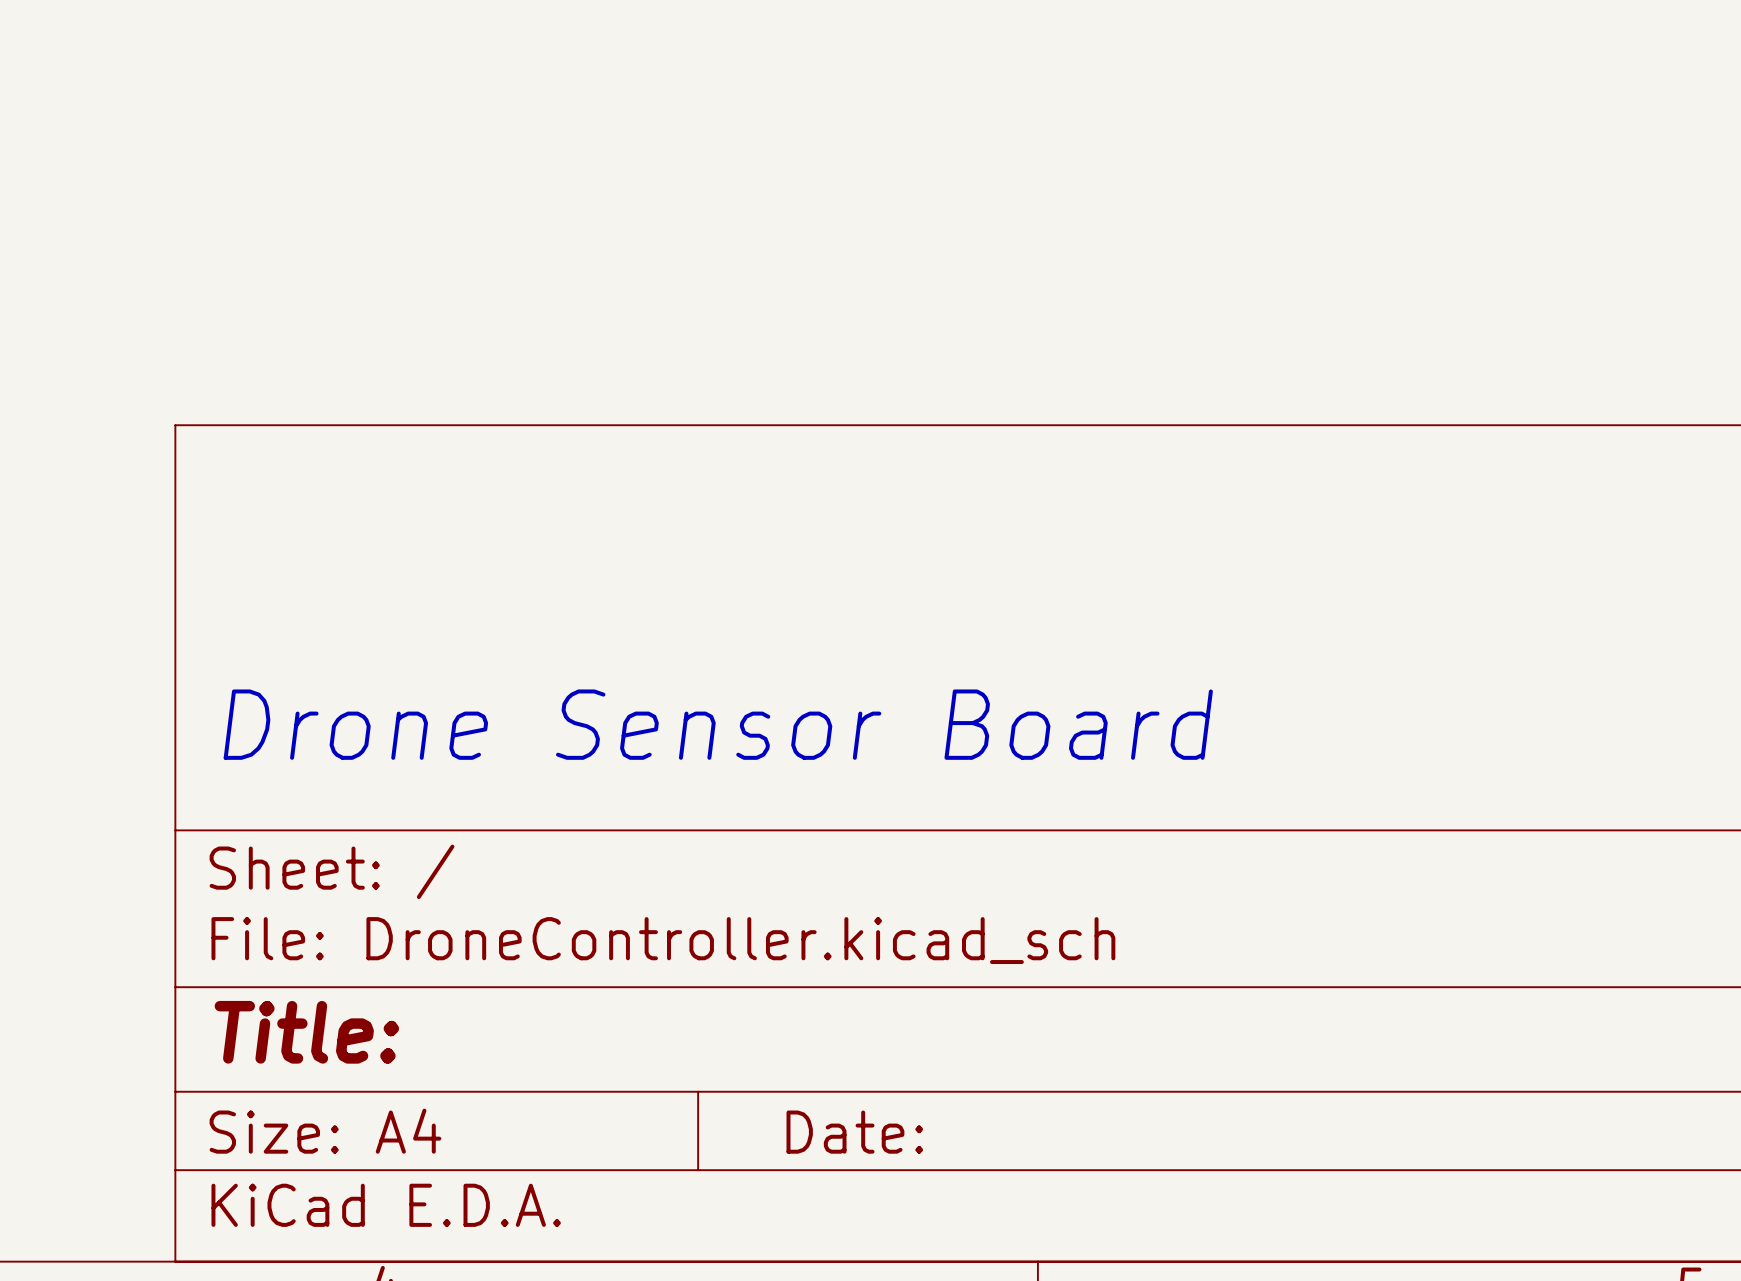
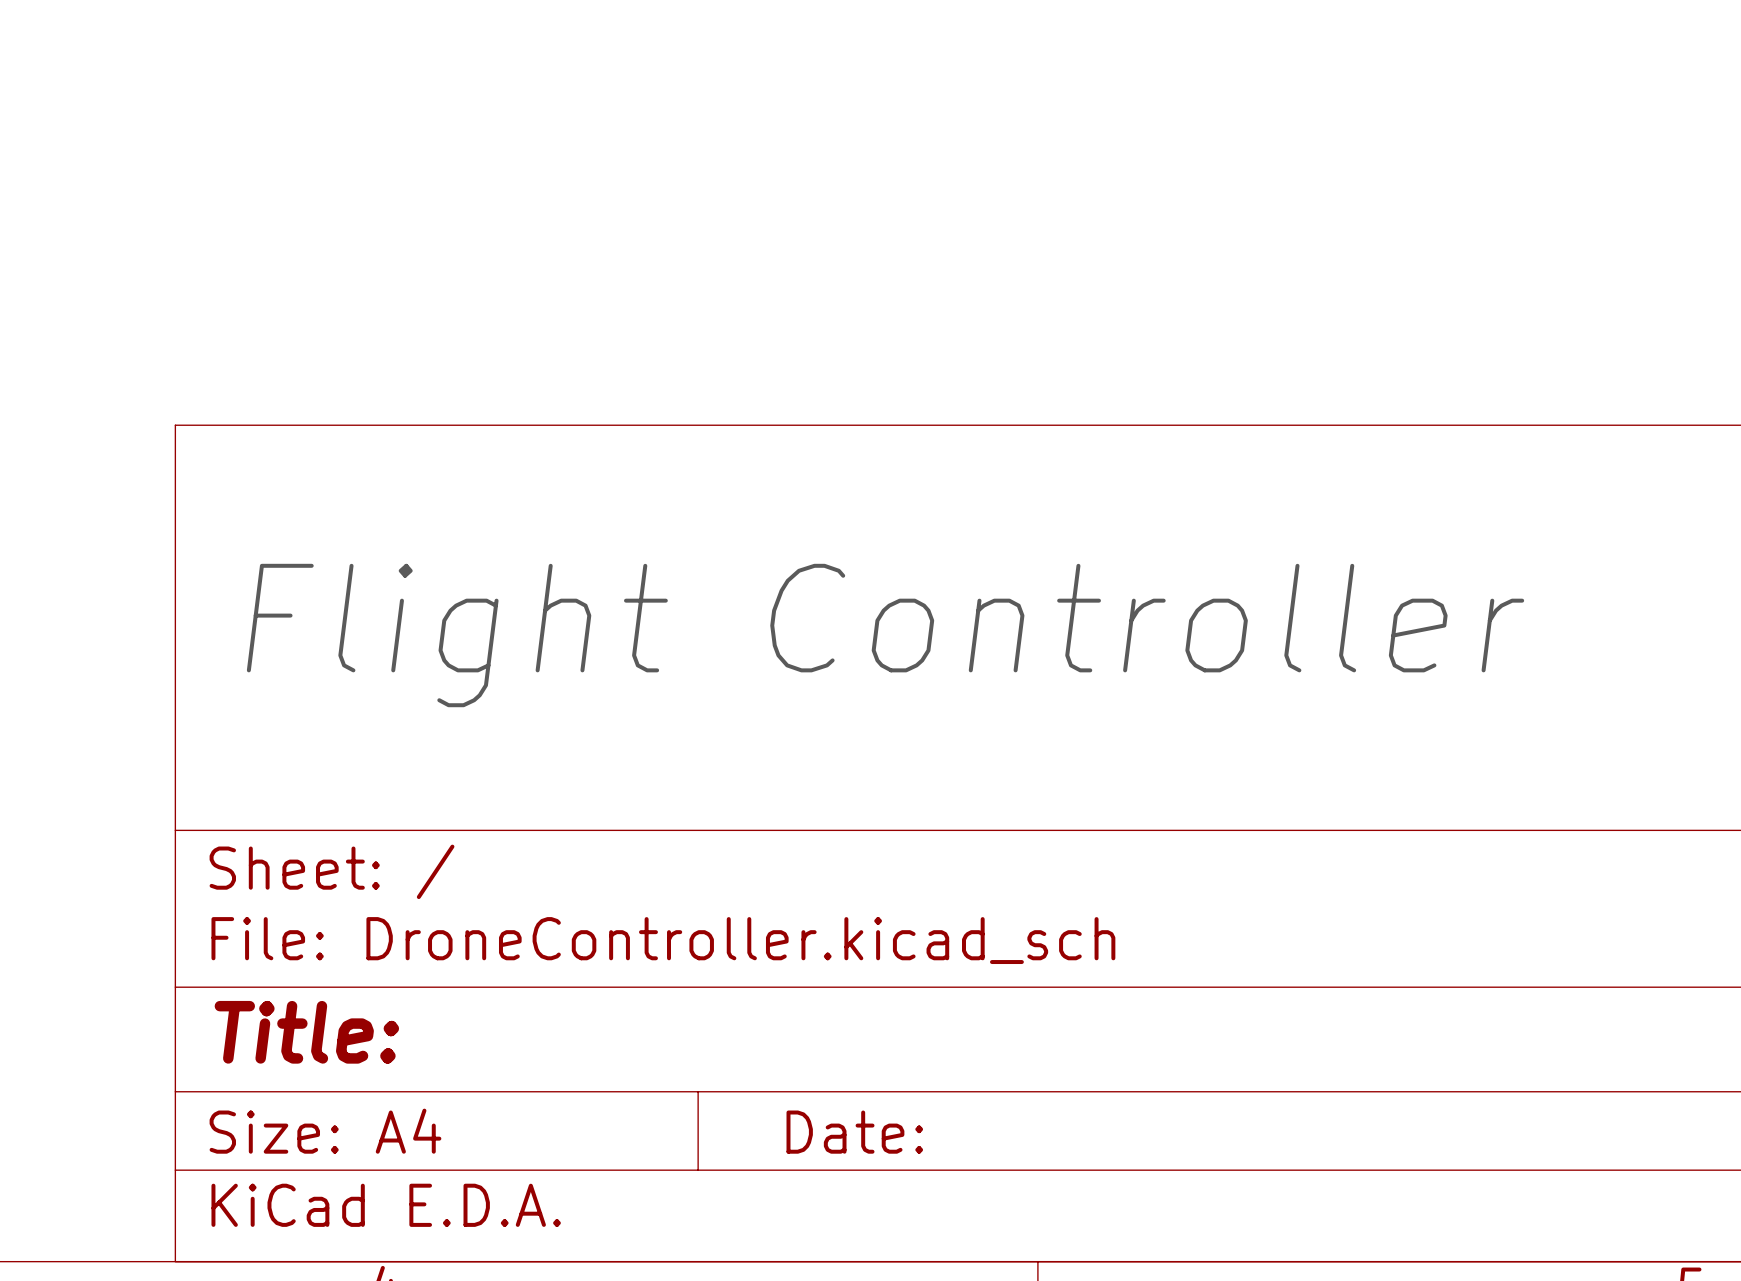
text: none -> Flight Controller (885, 635)
text: Drone Sensor Board (718, 724) -> none

